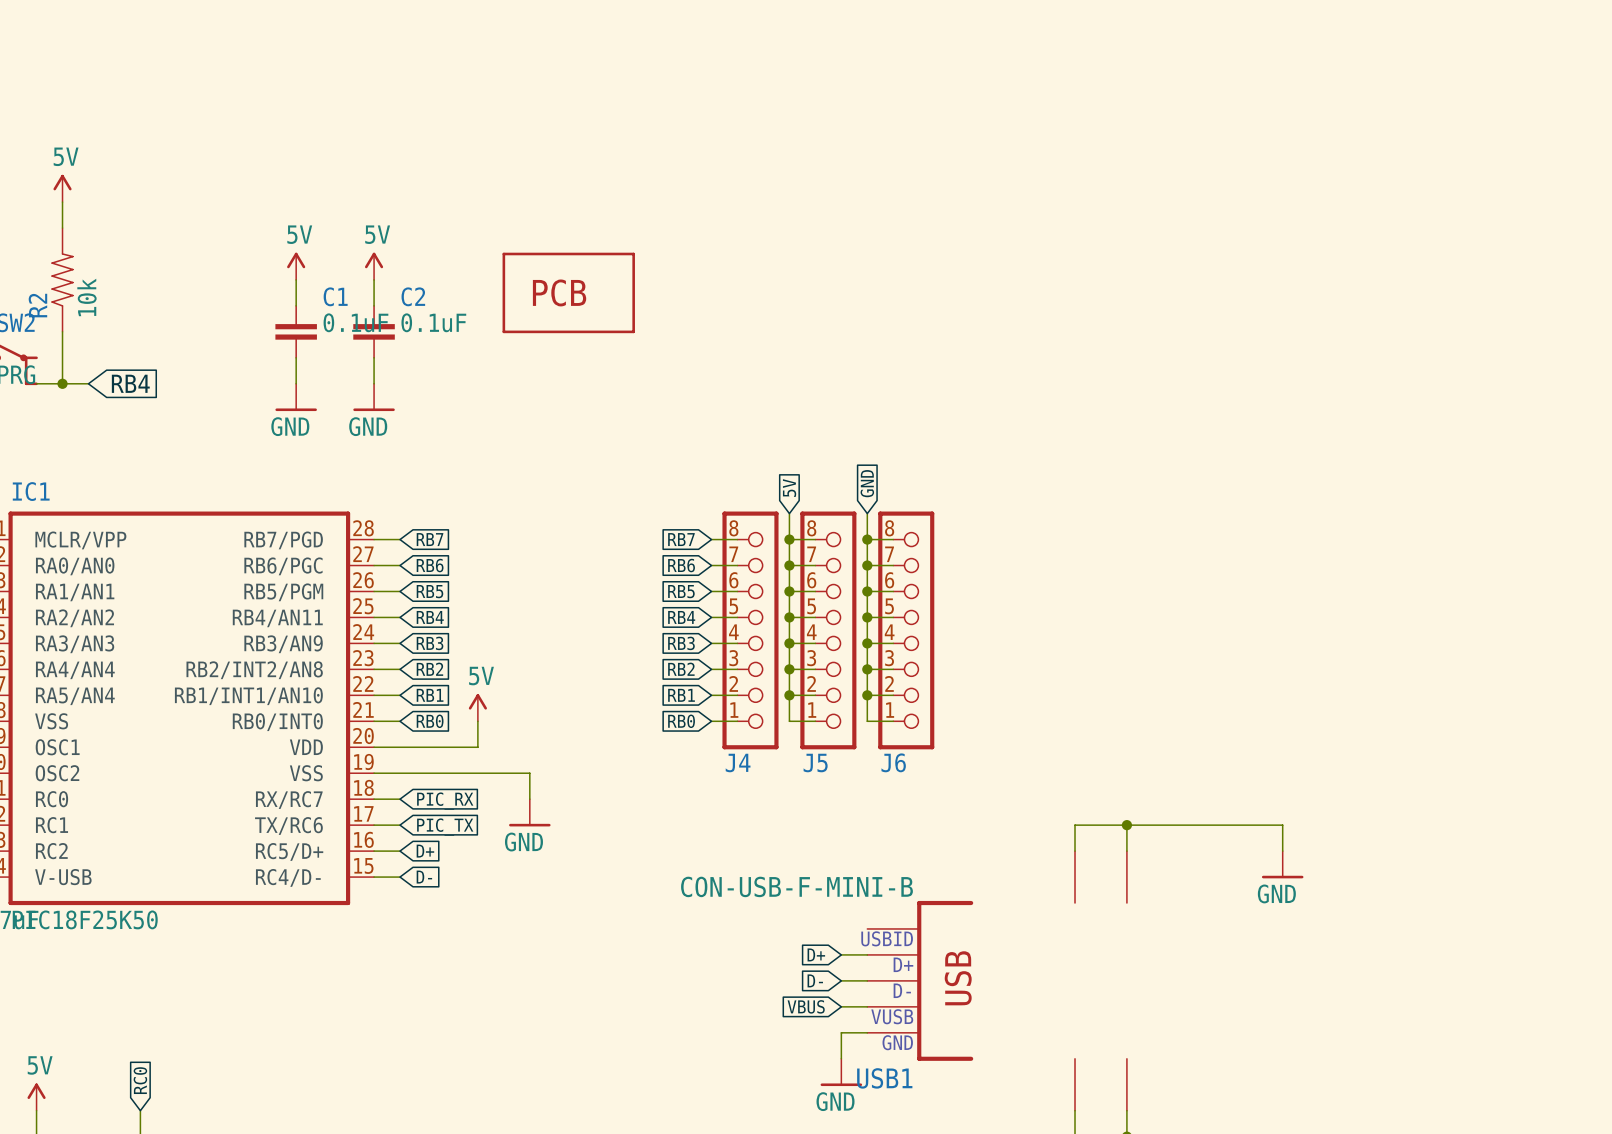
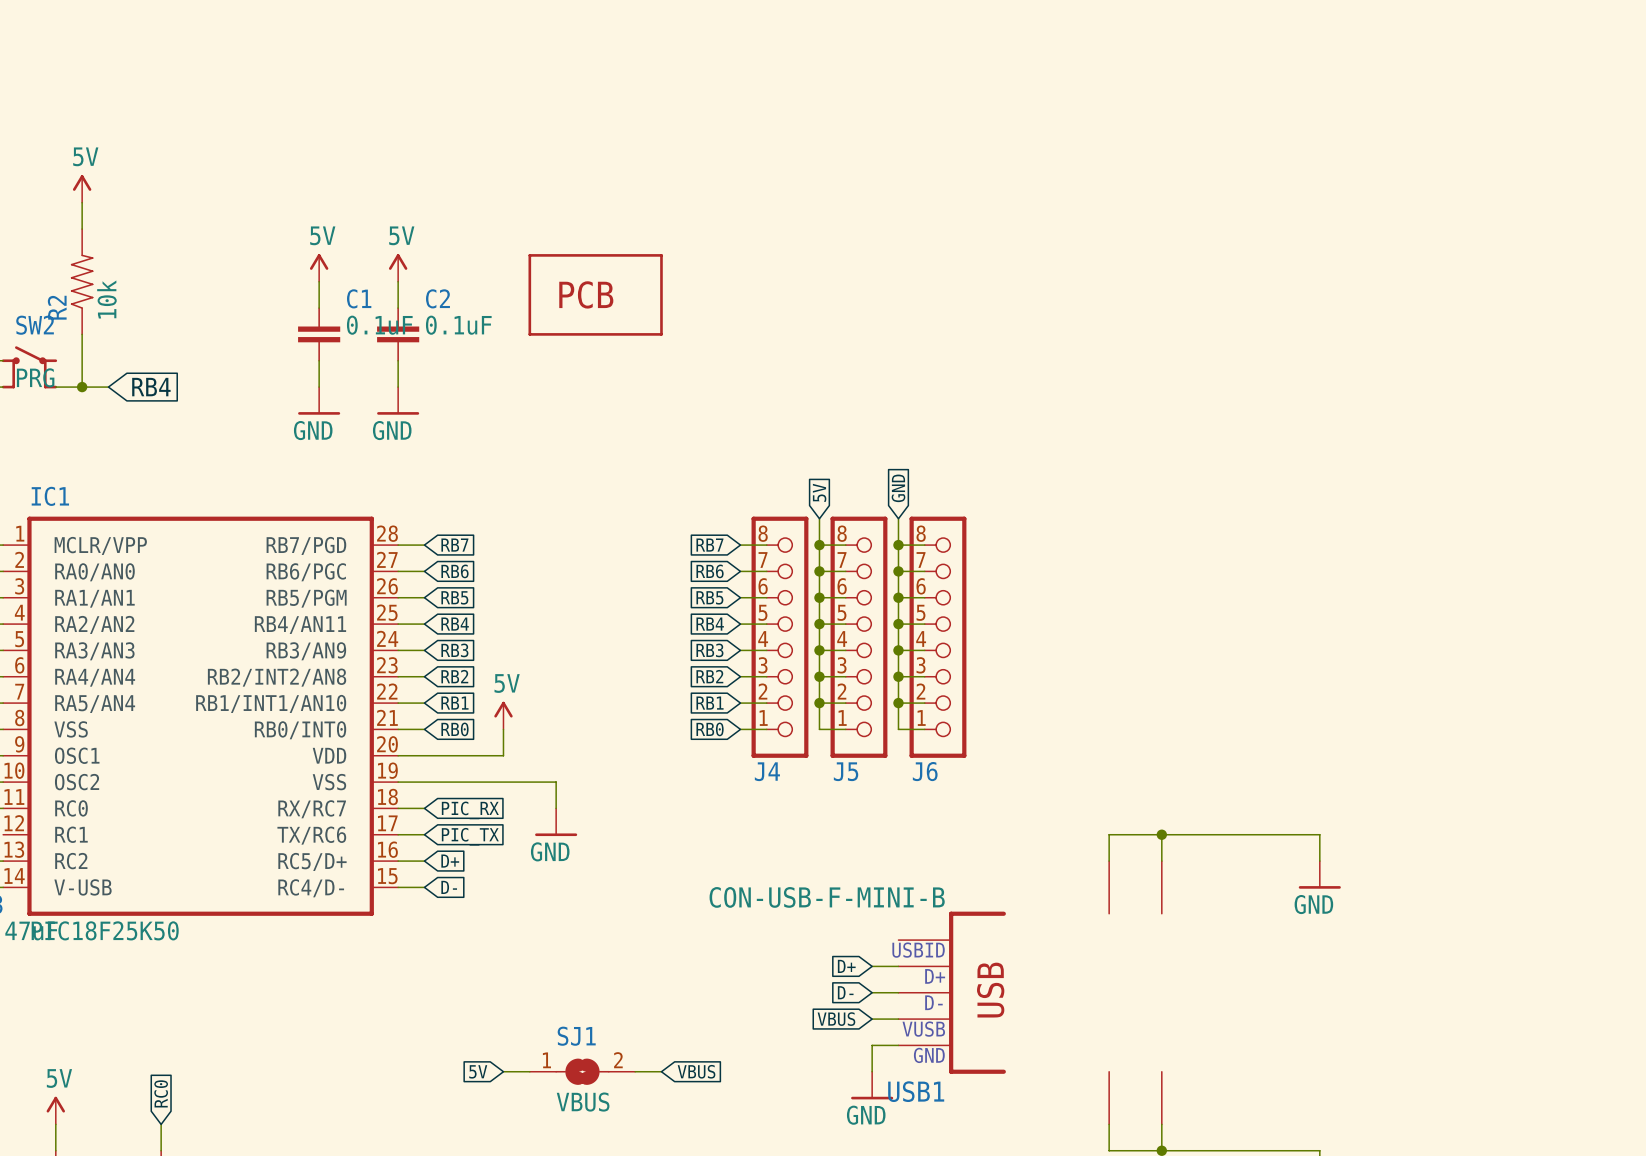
global label: none -> 5V (478, 1071)
wire: none -> (503, 1071) (529, 1071)
SJ1: none -> VBUS (582, 1071)
wire: none -> (635, 1071) (661, 1071)
global label: none -> VBUS (696, 1071)

